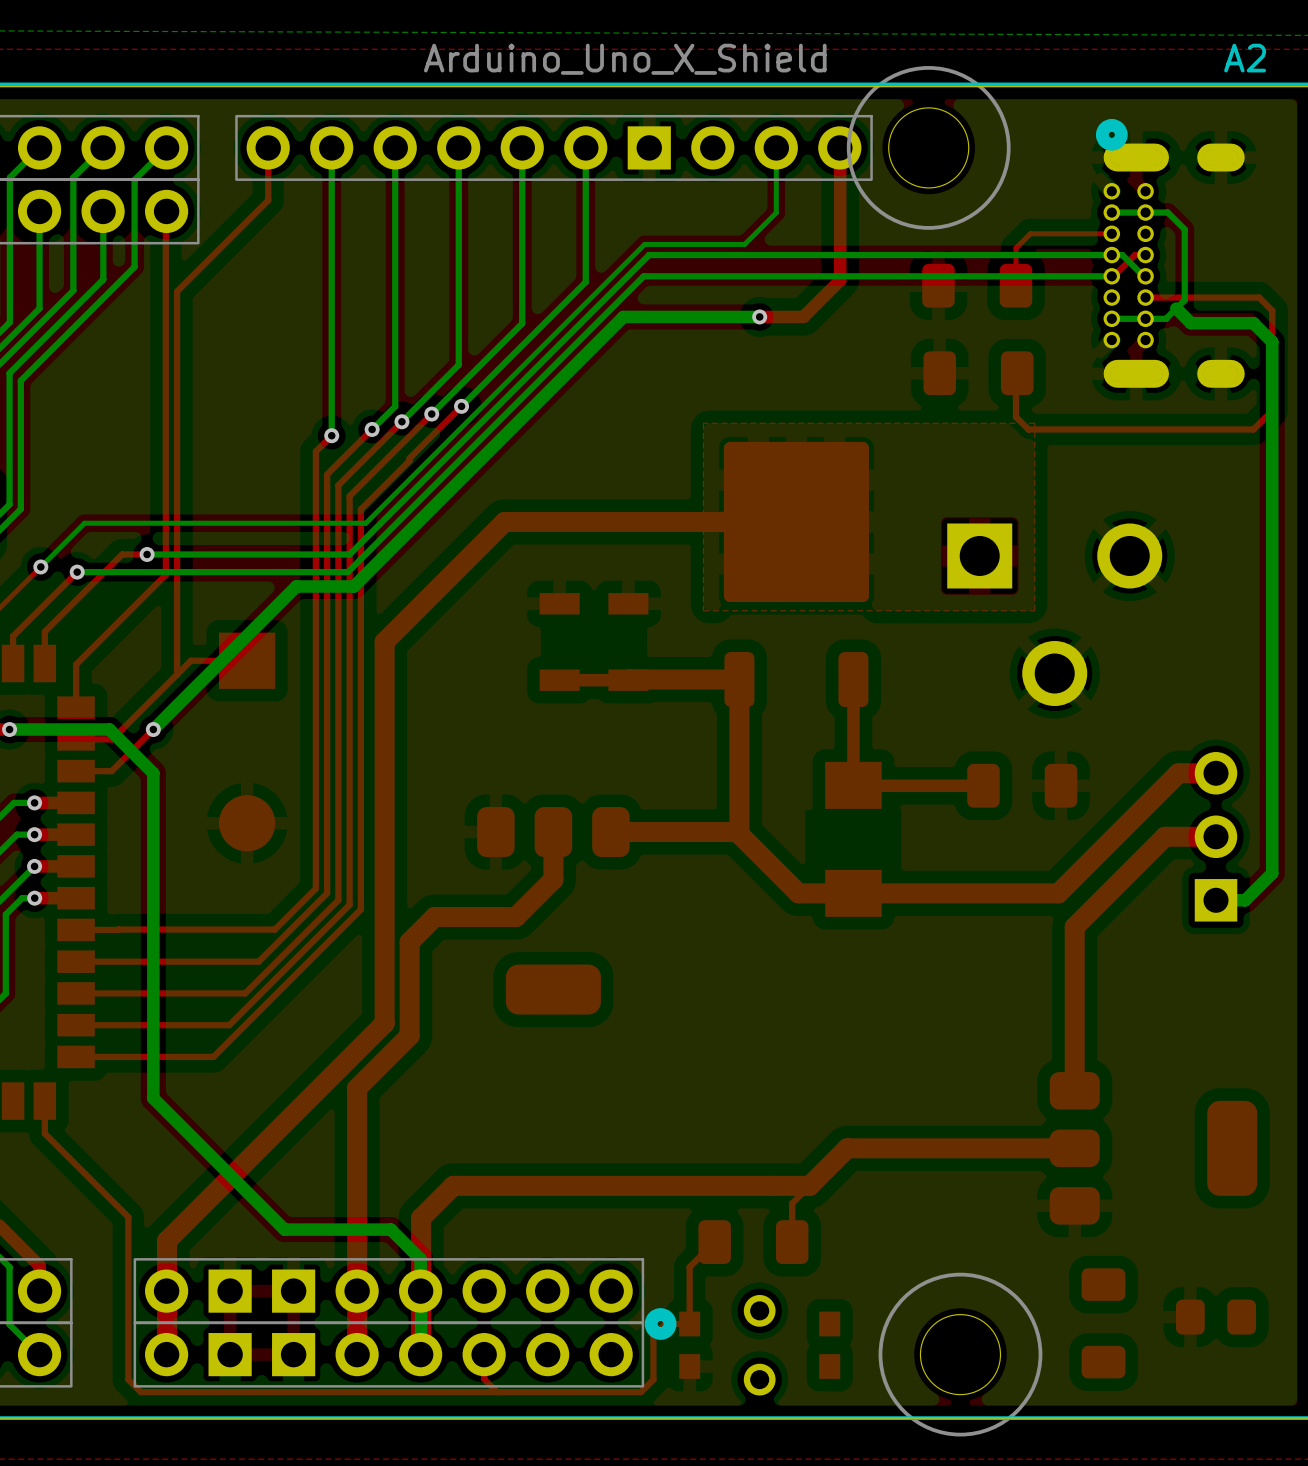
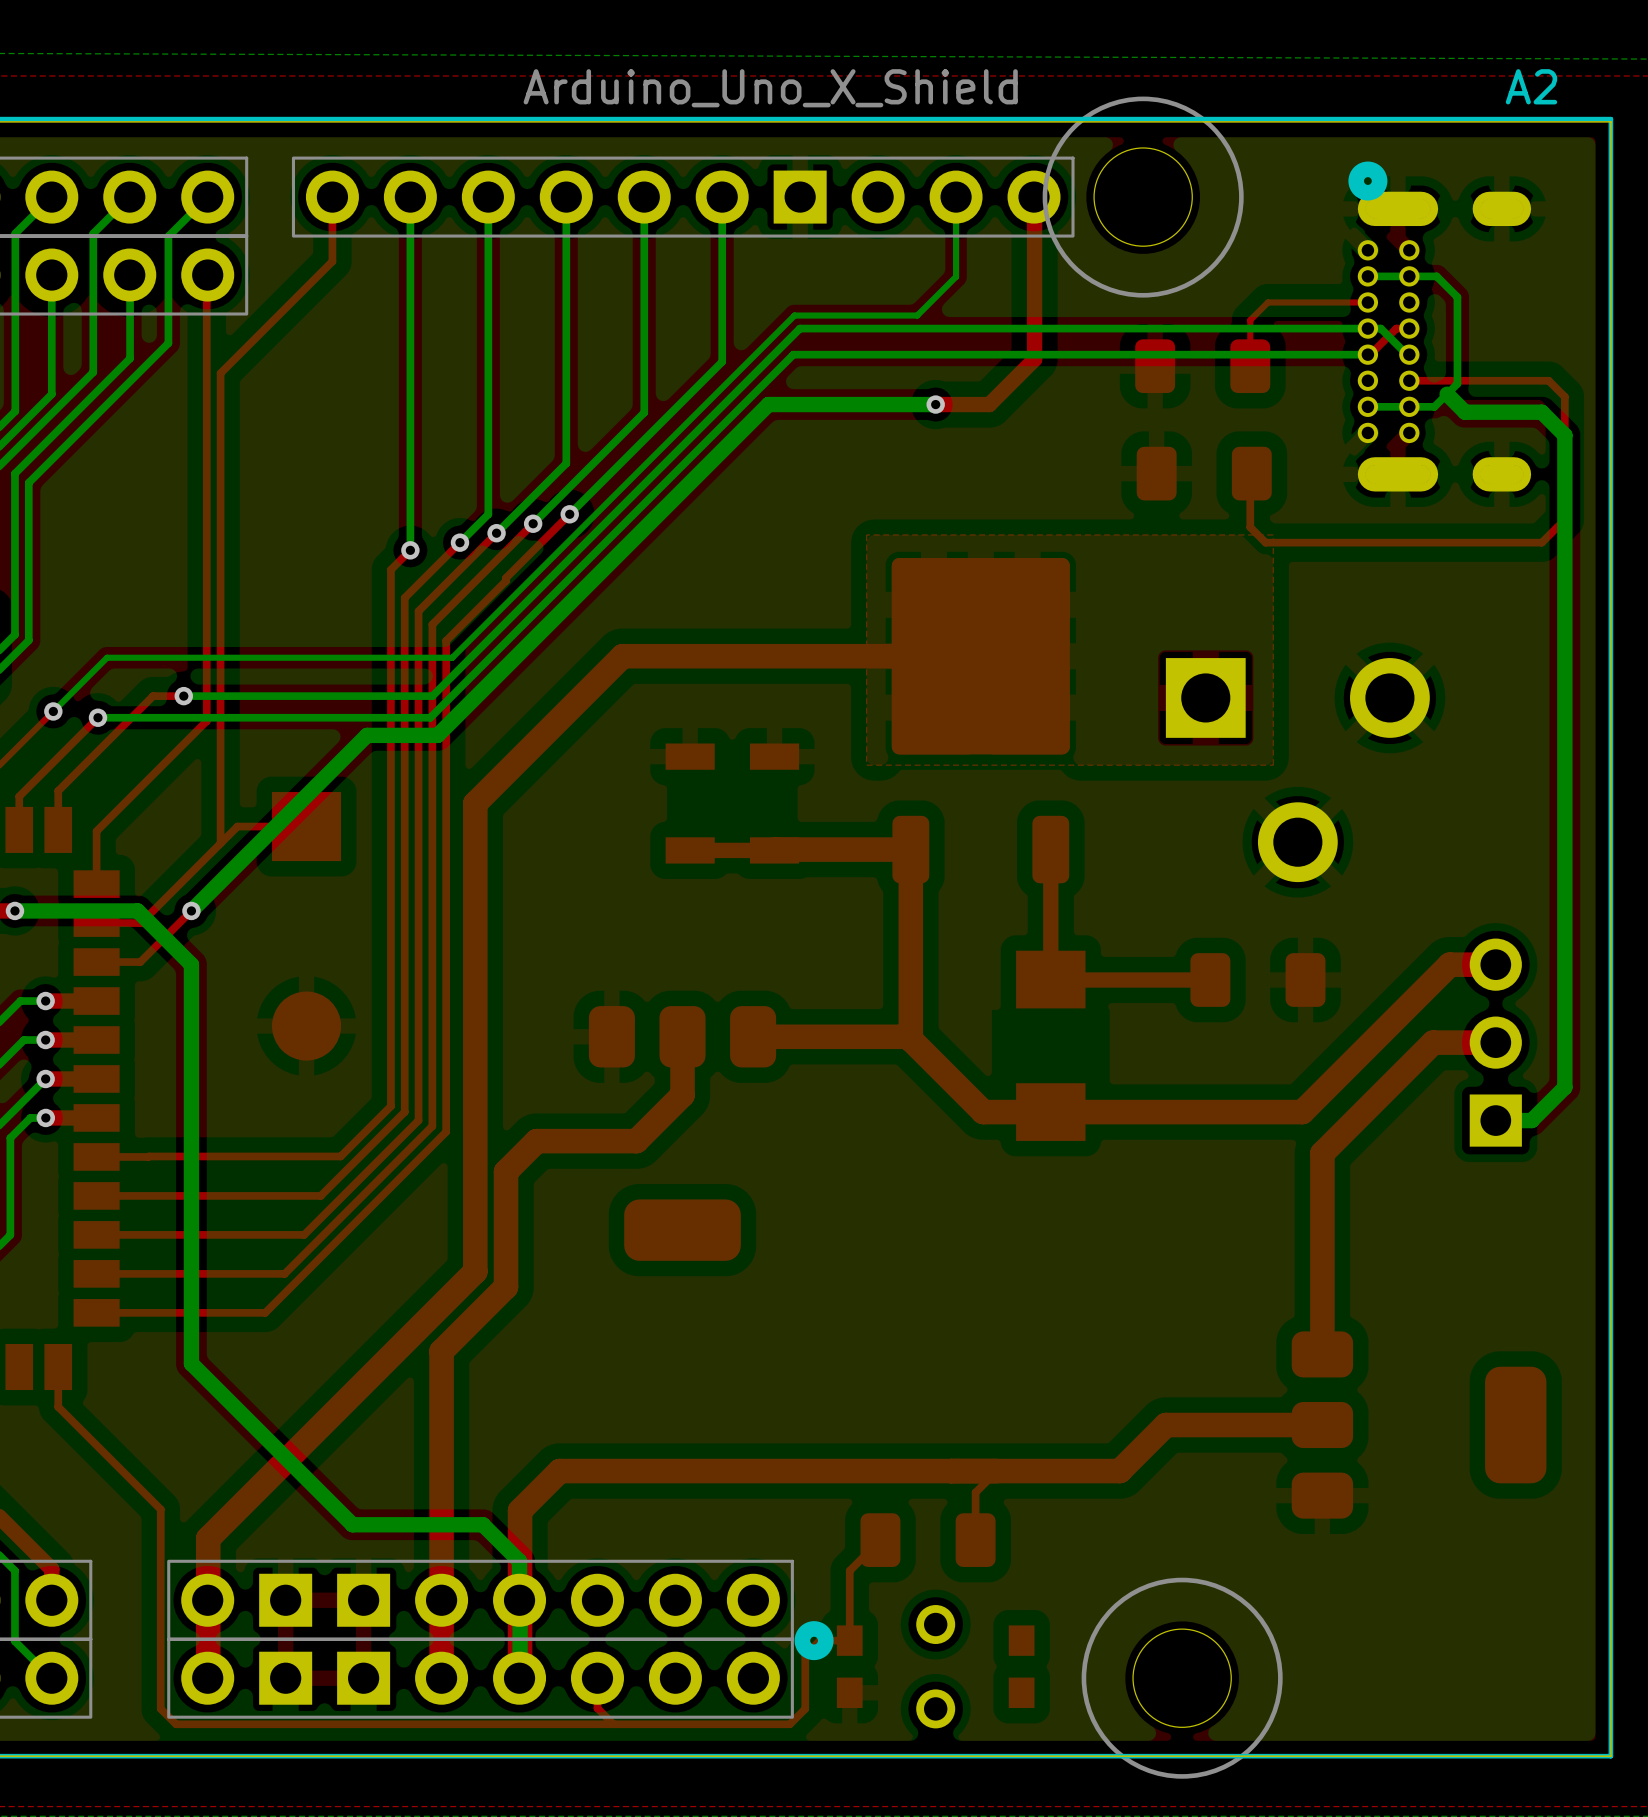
top track: (947, 1148) (847, 1148) (809, 1185) -> (1165, 1425) (1119, 1471) (997, 1471)
part: (1216, 1317) -> none
part: (1103, 1323) -> none

